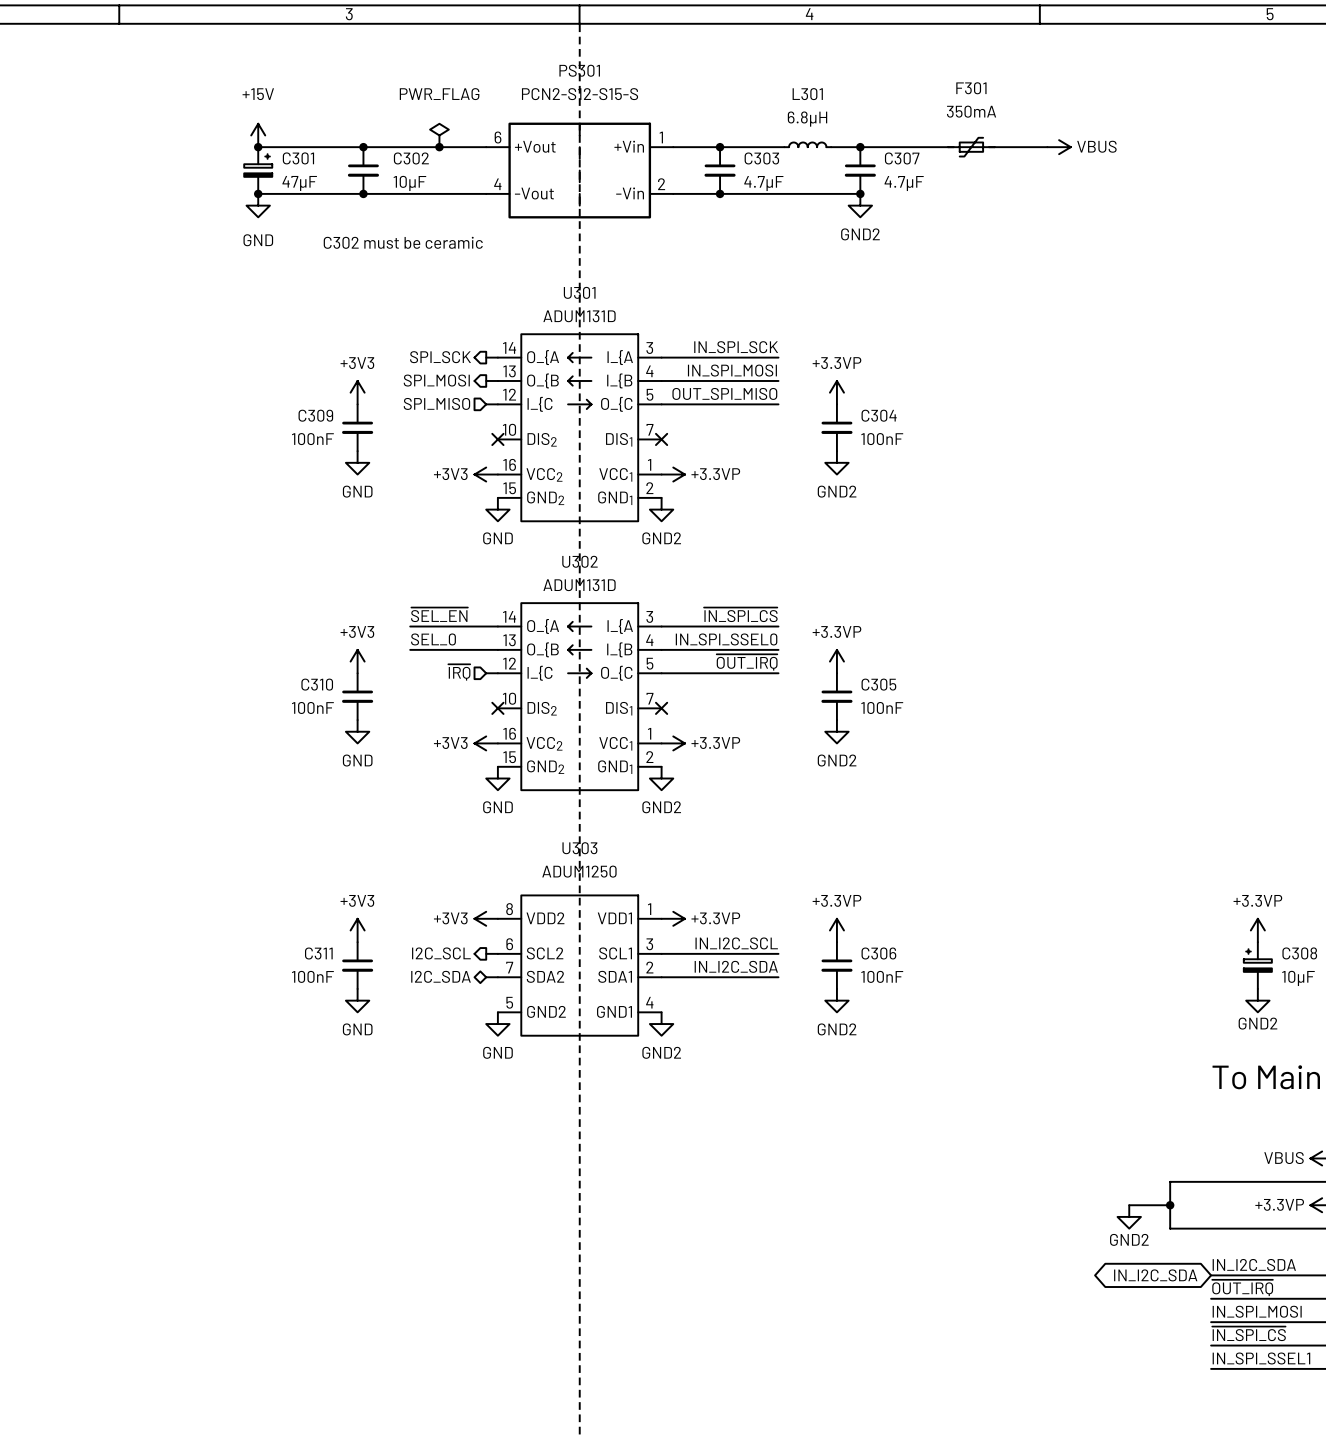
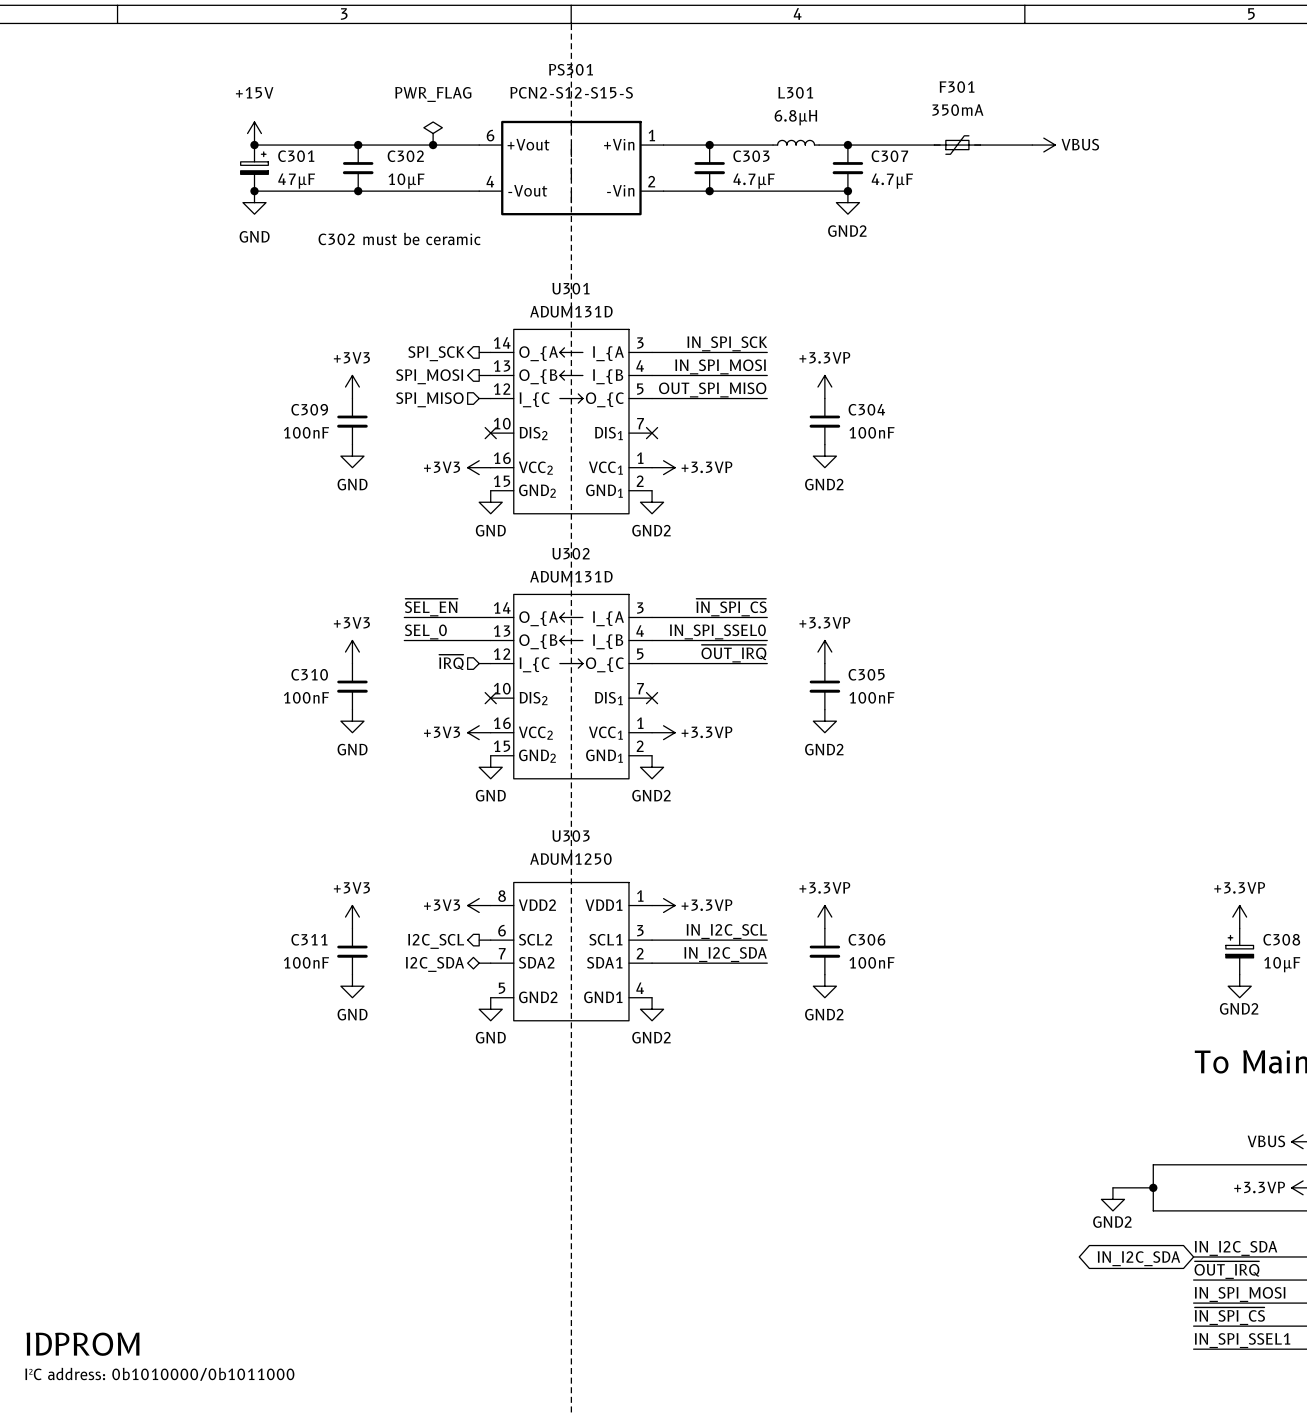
text: none -> IDPROM (82, 1344)
text: none -> I²C address: 0b1010000/0b1011000 (159, 1374)

